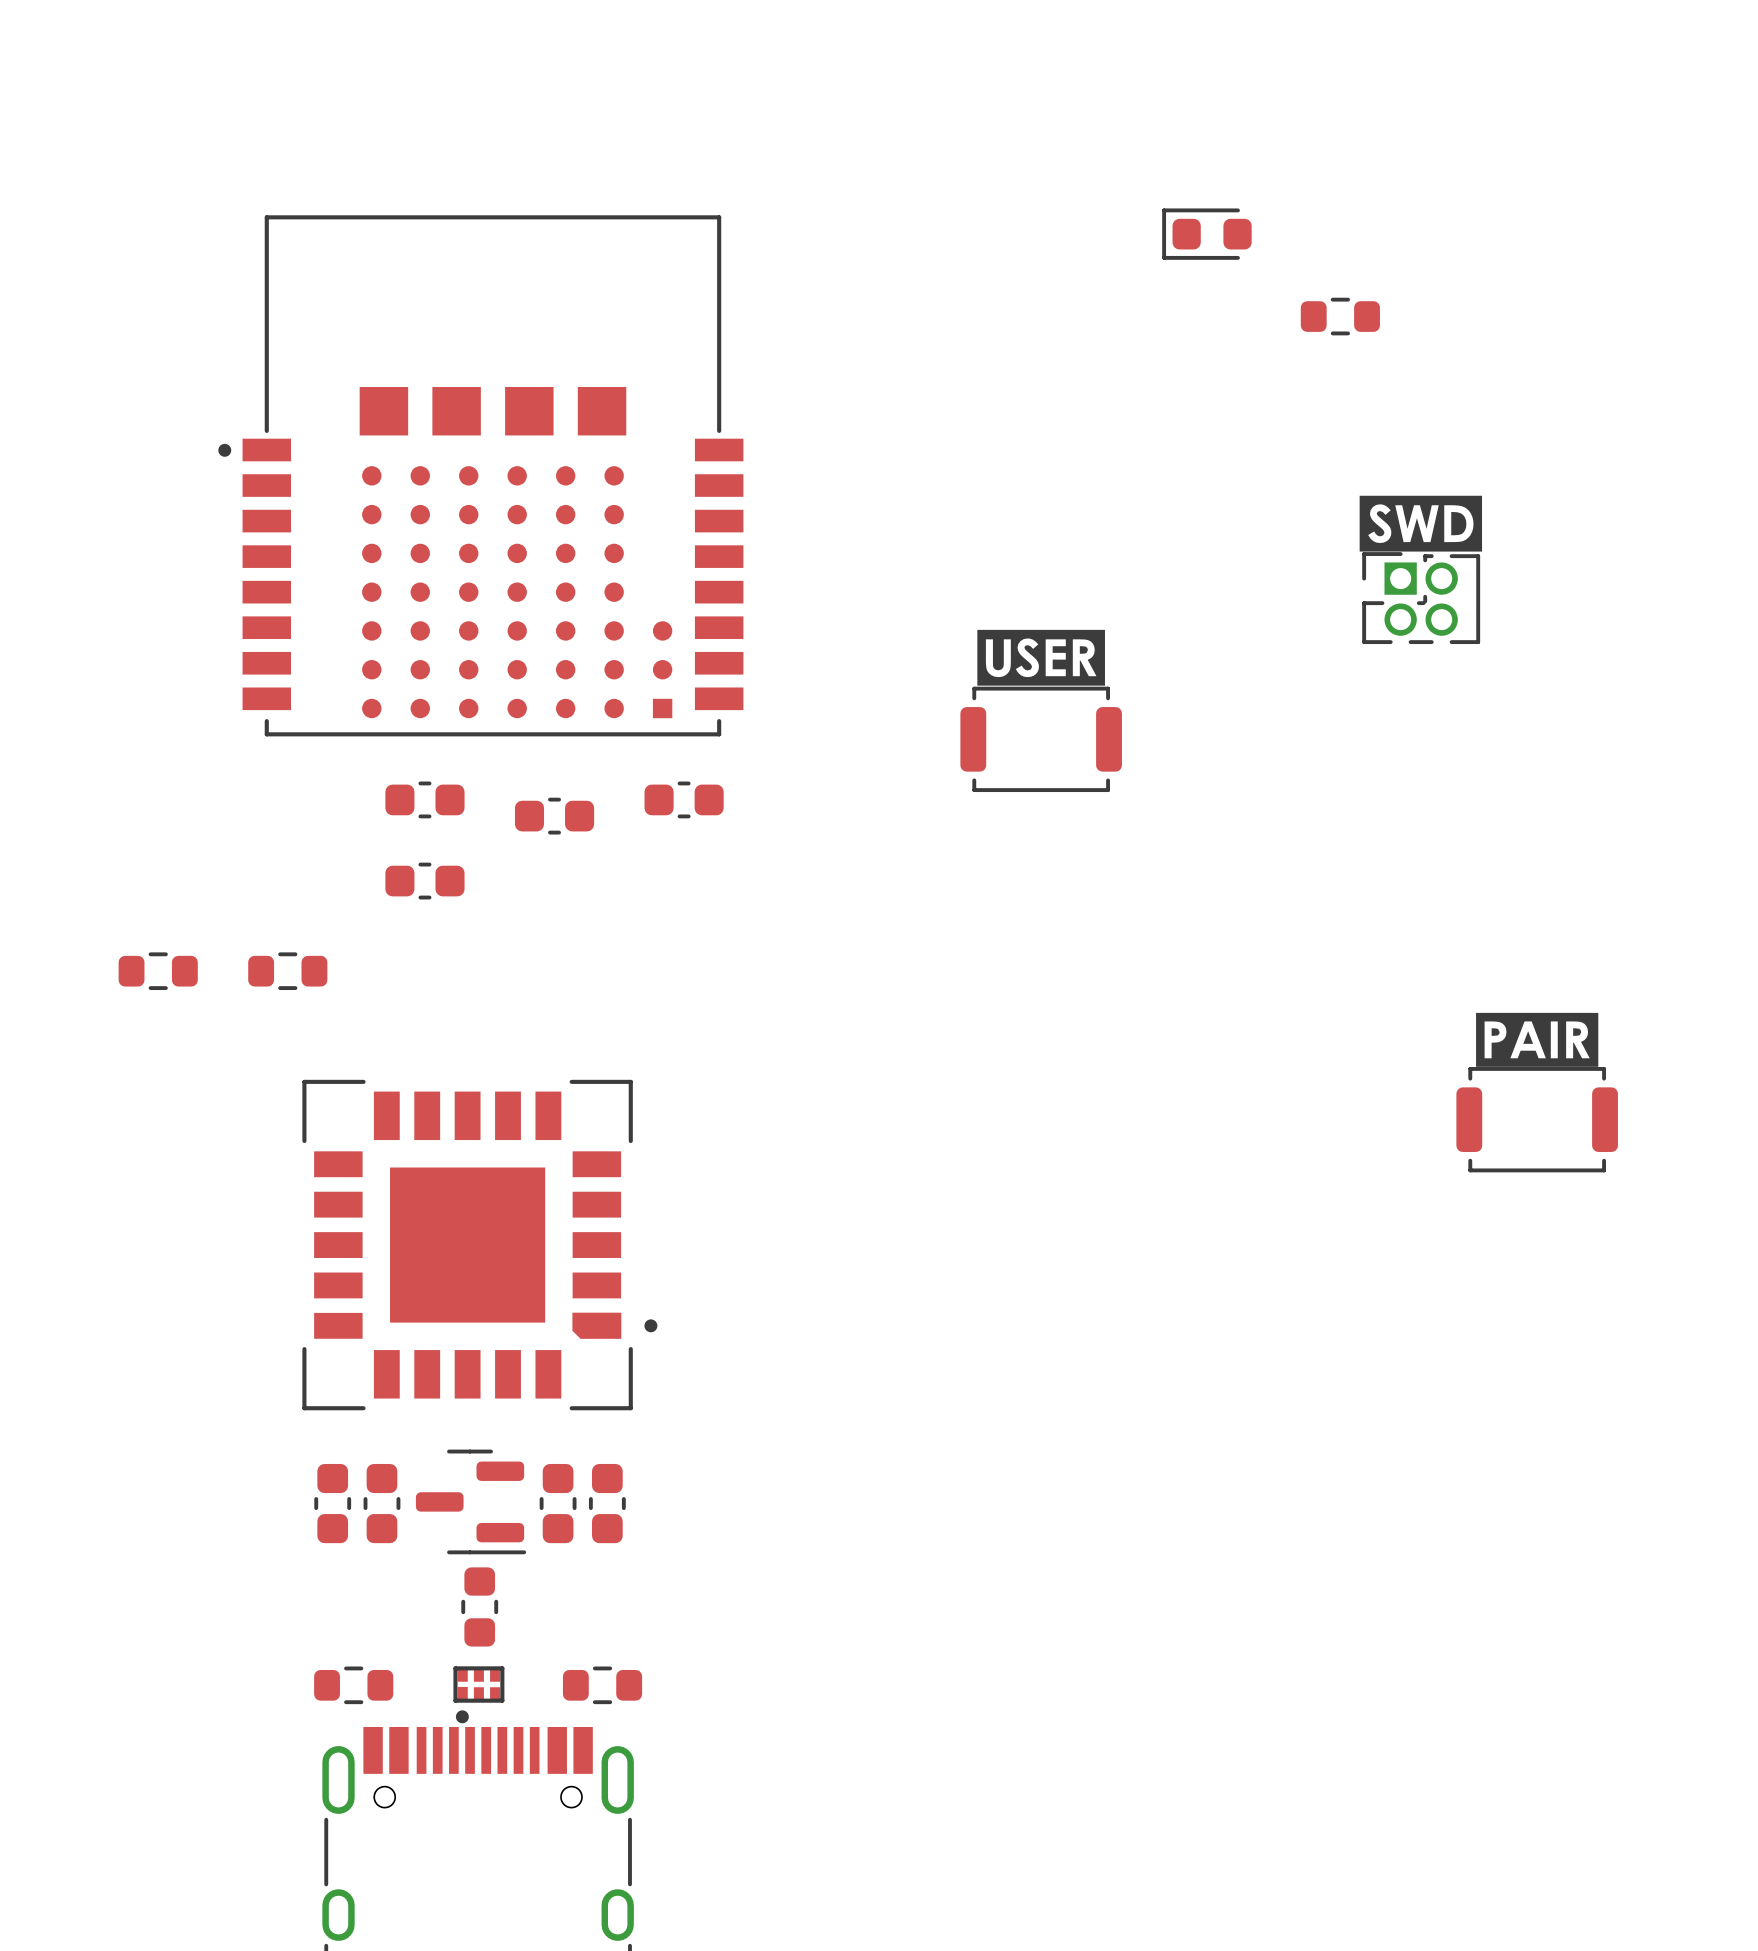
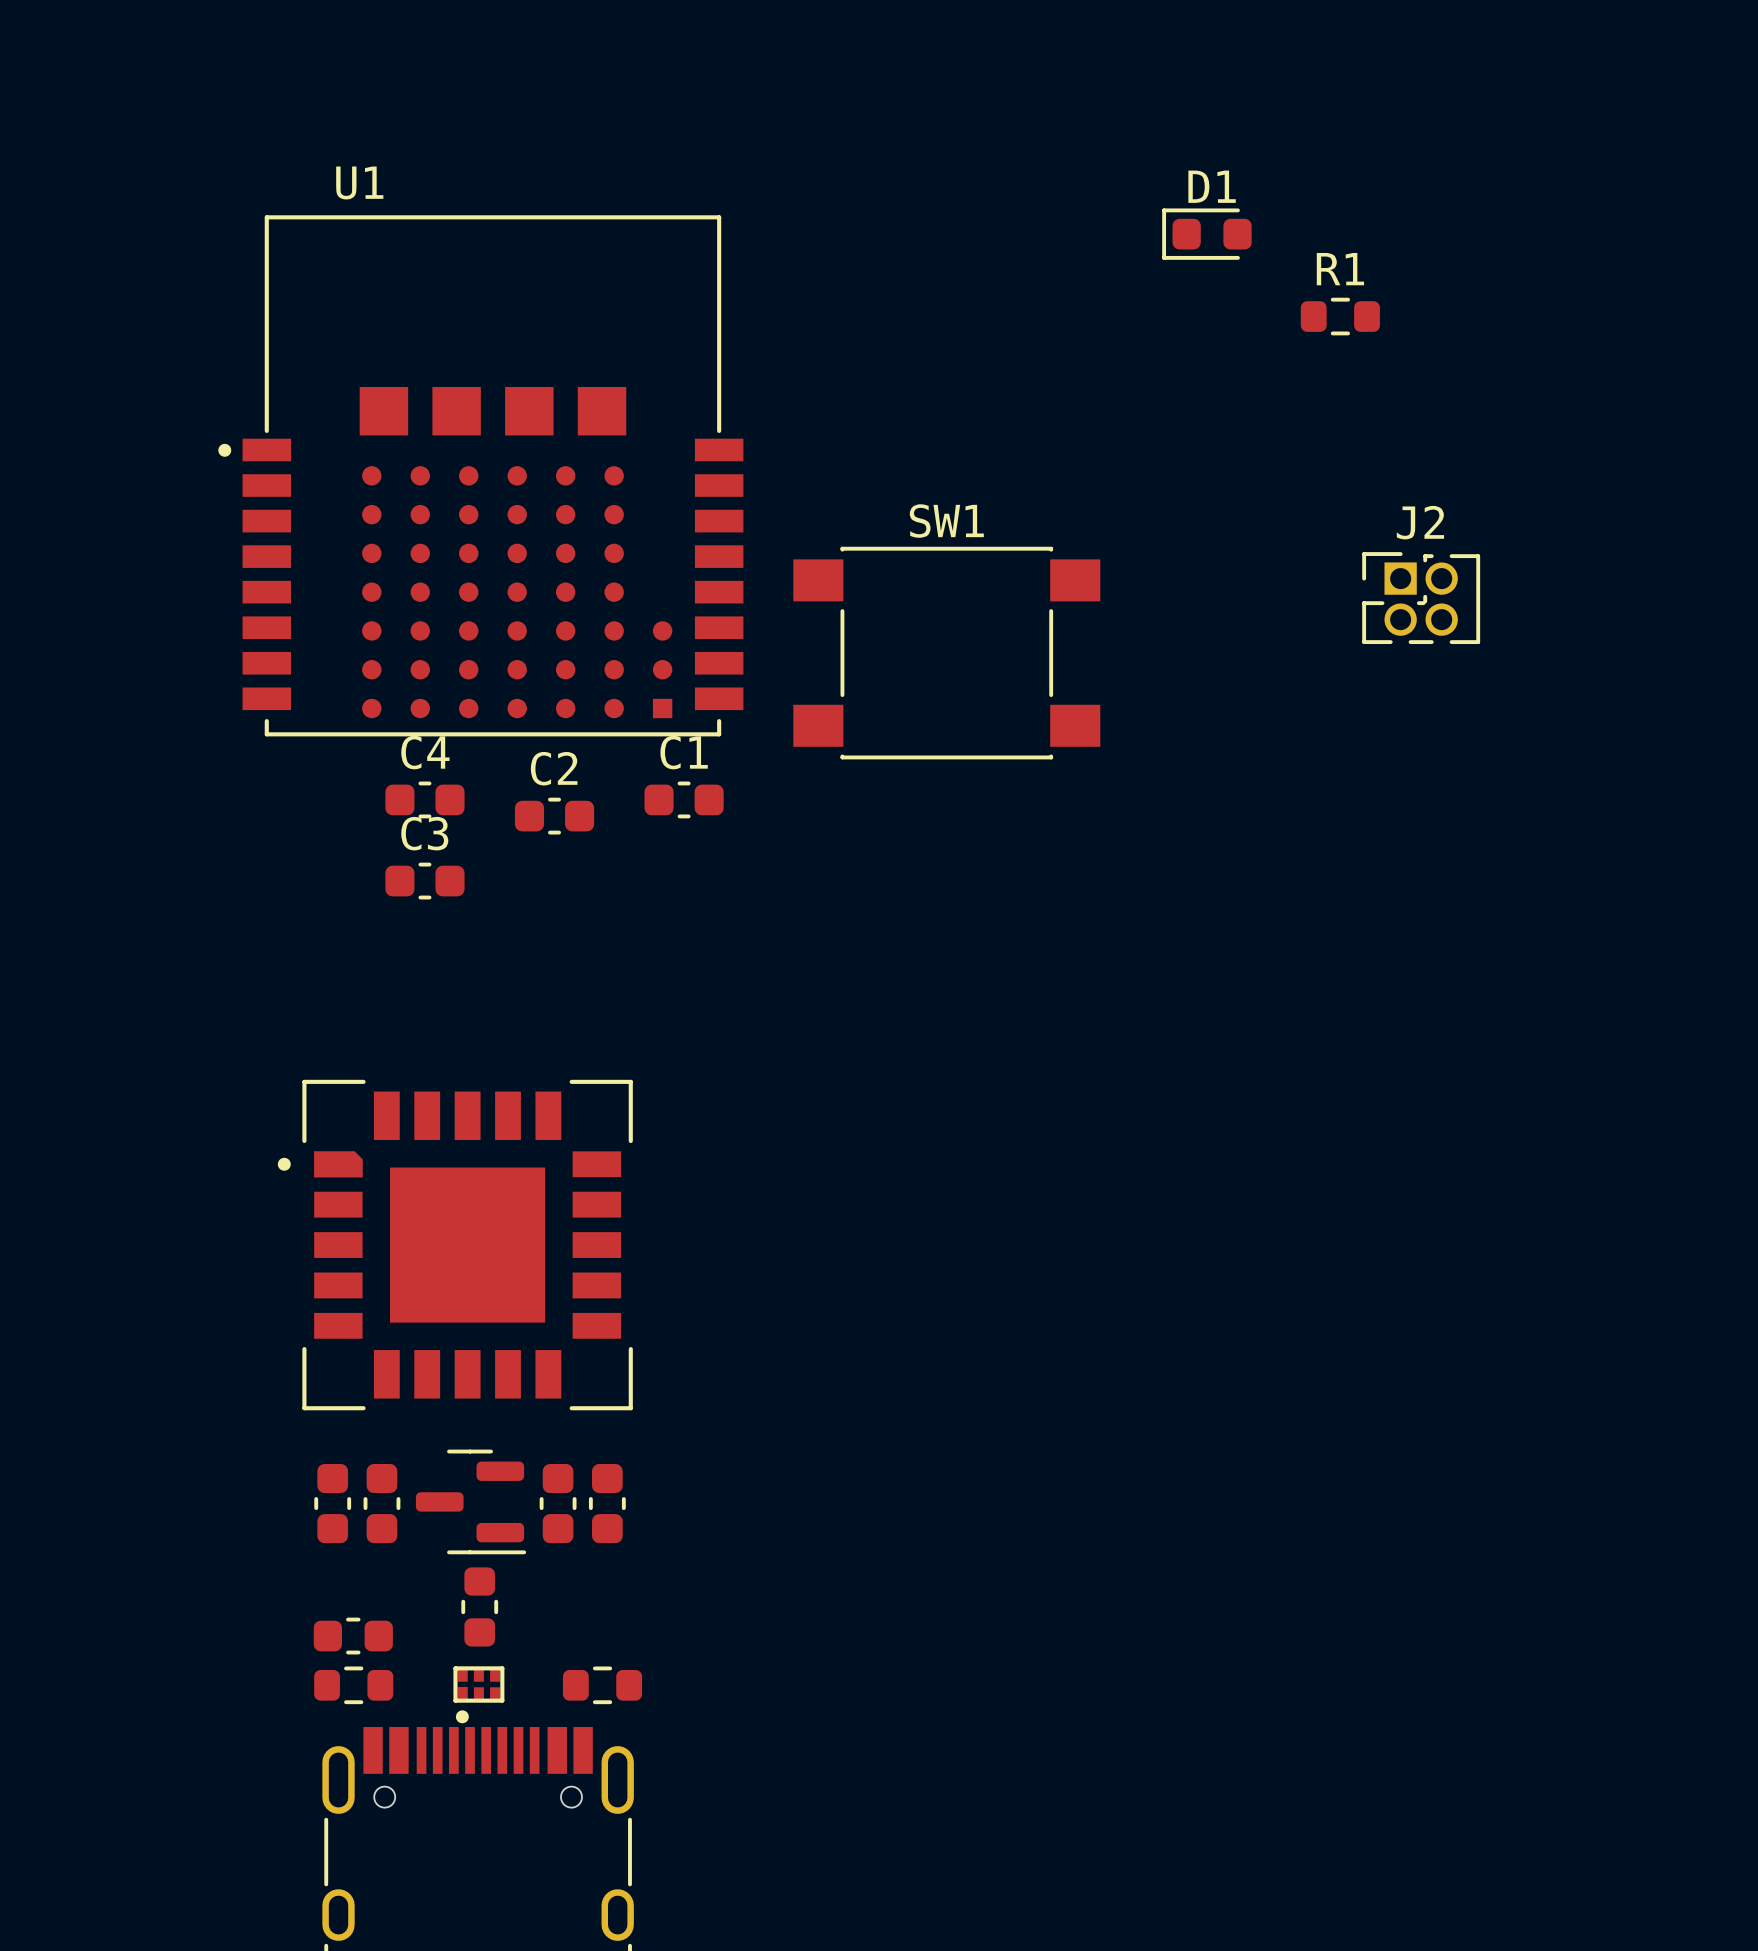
U1 name: none -> U1 (359, 183)
D1 name: none -> D1 (1212, 186)
R1 name: none -> R1 (1340, 269)
drawing: [1359, 495, 1483, 552] -> none
J2 name: none -> J2 (1420, 522)
drawing: [977, 629, 1105, 686] -> none
SW1: none -> (946, 653)
part: (1041, 739) -> none
C4 name: none -> C4 (425, 752)
C1 name: none -> C1 (684, 752)
C2 name: none -> C2 (554, 768)
C3 name: none -> C3 (424, 833)
part: (158, 971) -> none
part: (287, 971) -> none
drawing: [1476, 1012, 1599, 1067] -> none
part: (1537, 1119) -> none
part rotation: 0° (479, 1245) -> 180° (455, 1245)
part: none -> (353, 1636)

